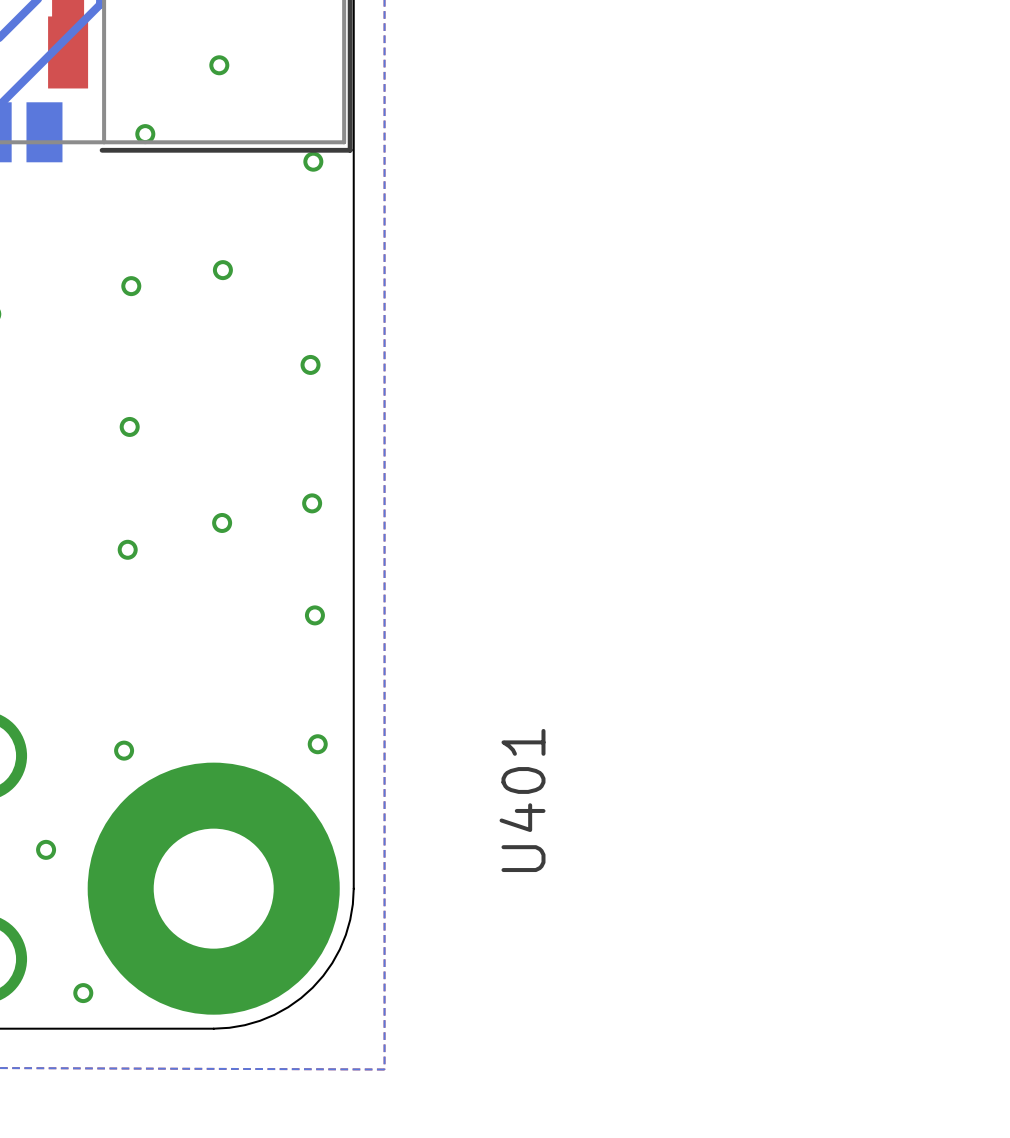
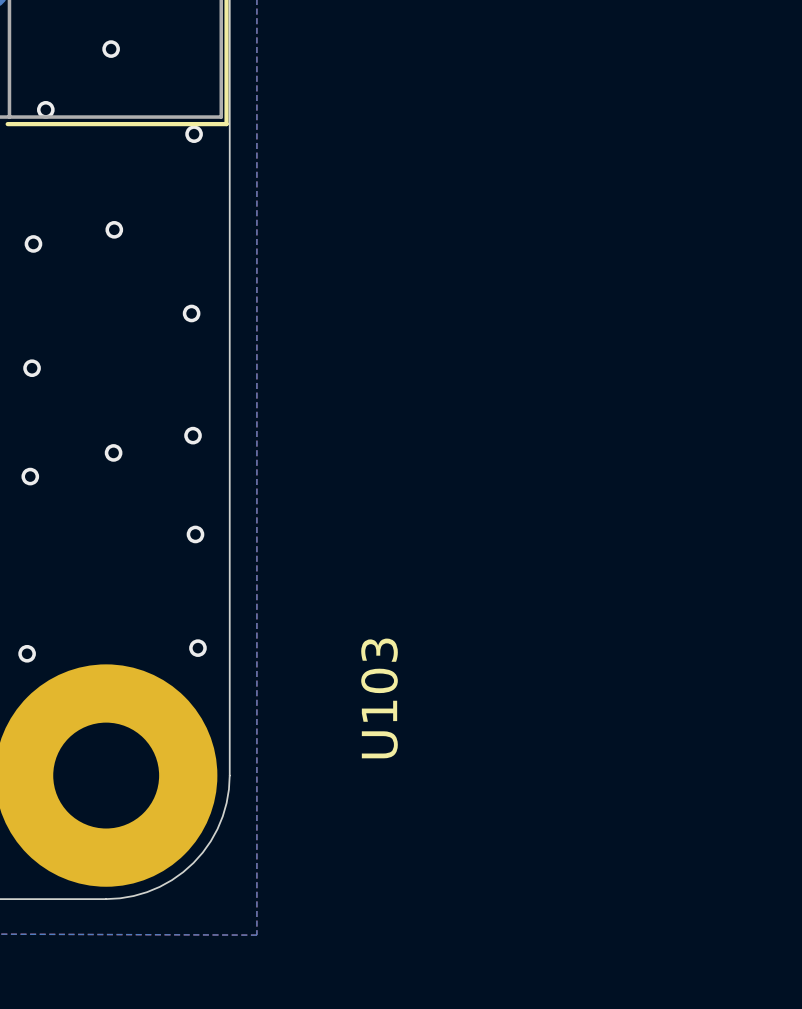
U401 name: U401 (522, 800) -> U103 (379, 698)

